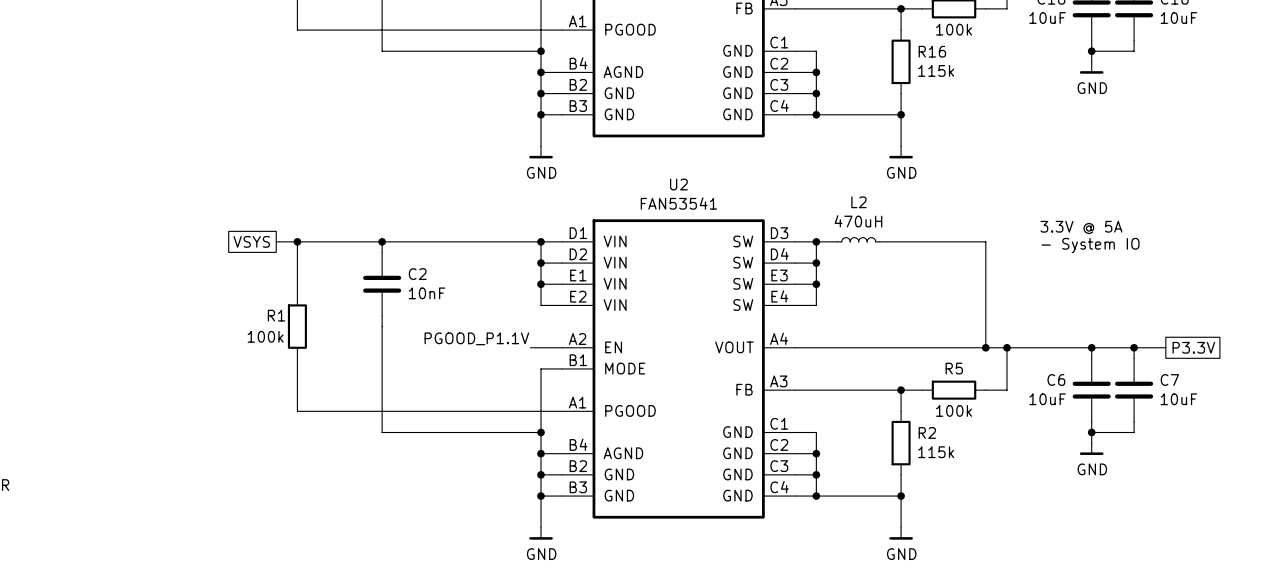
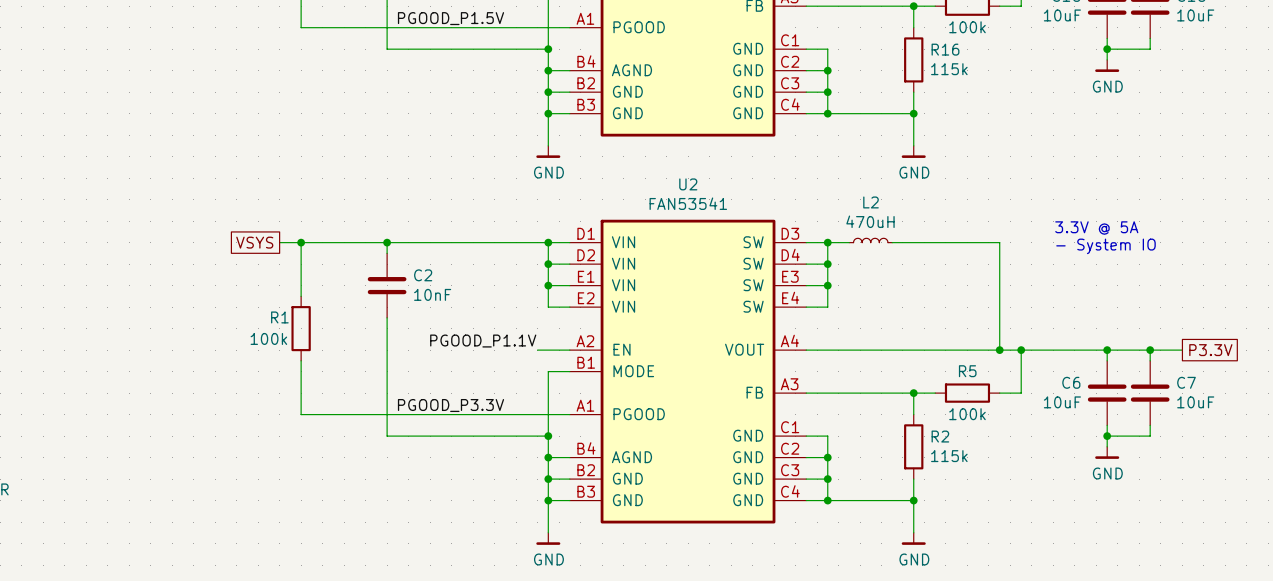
label: none -> PGOOD_P1.5V (450, 18)
label: none -> PGOOD_P3.3V (450, 405)

